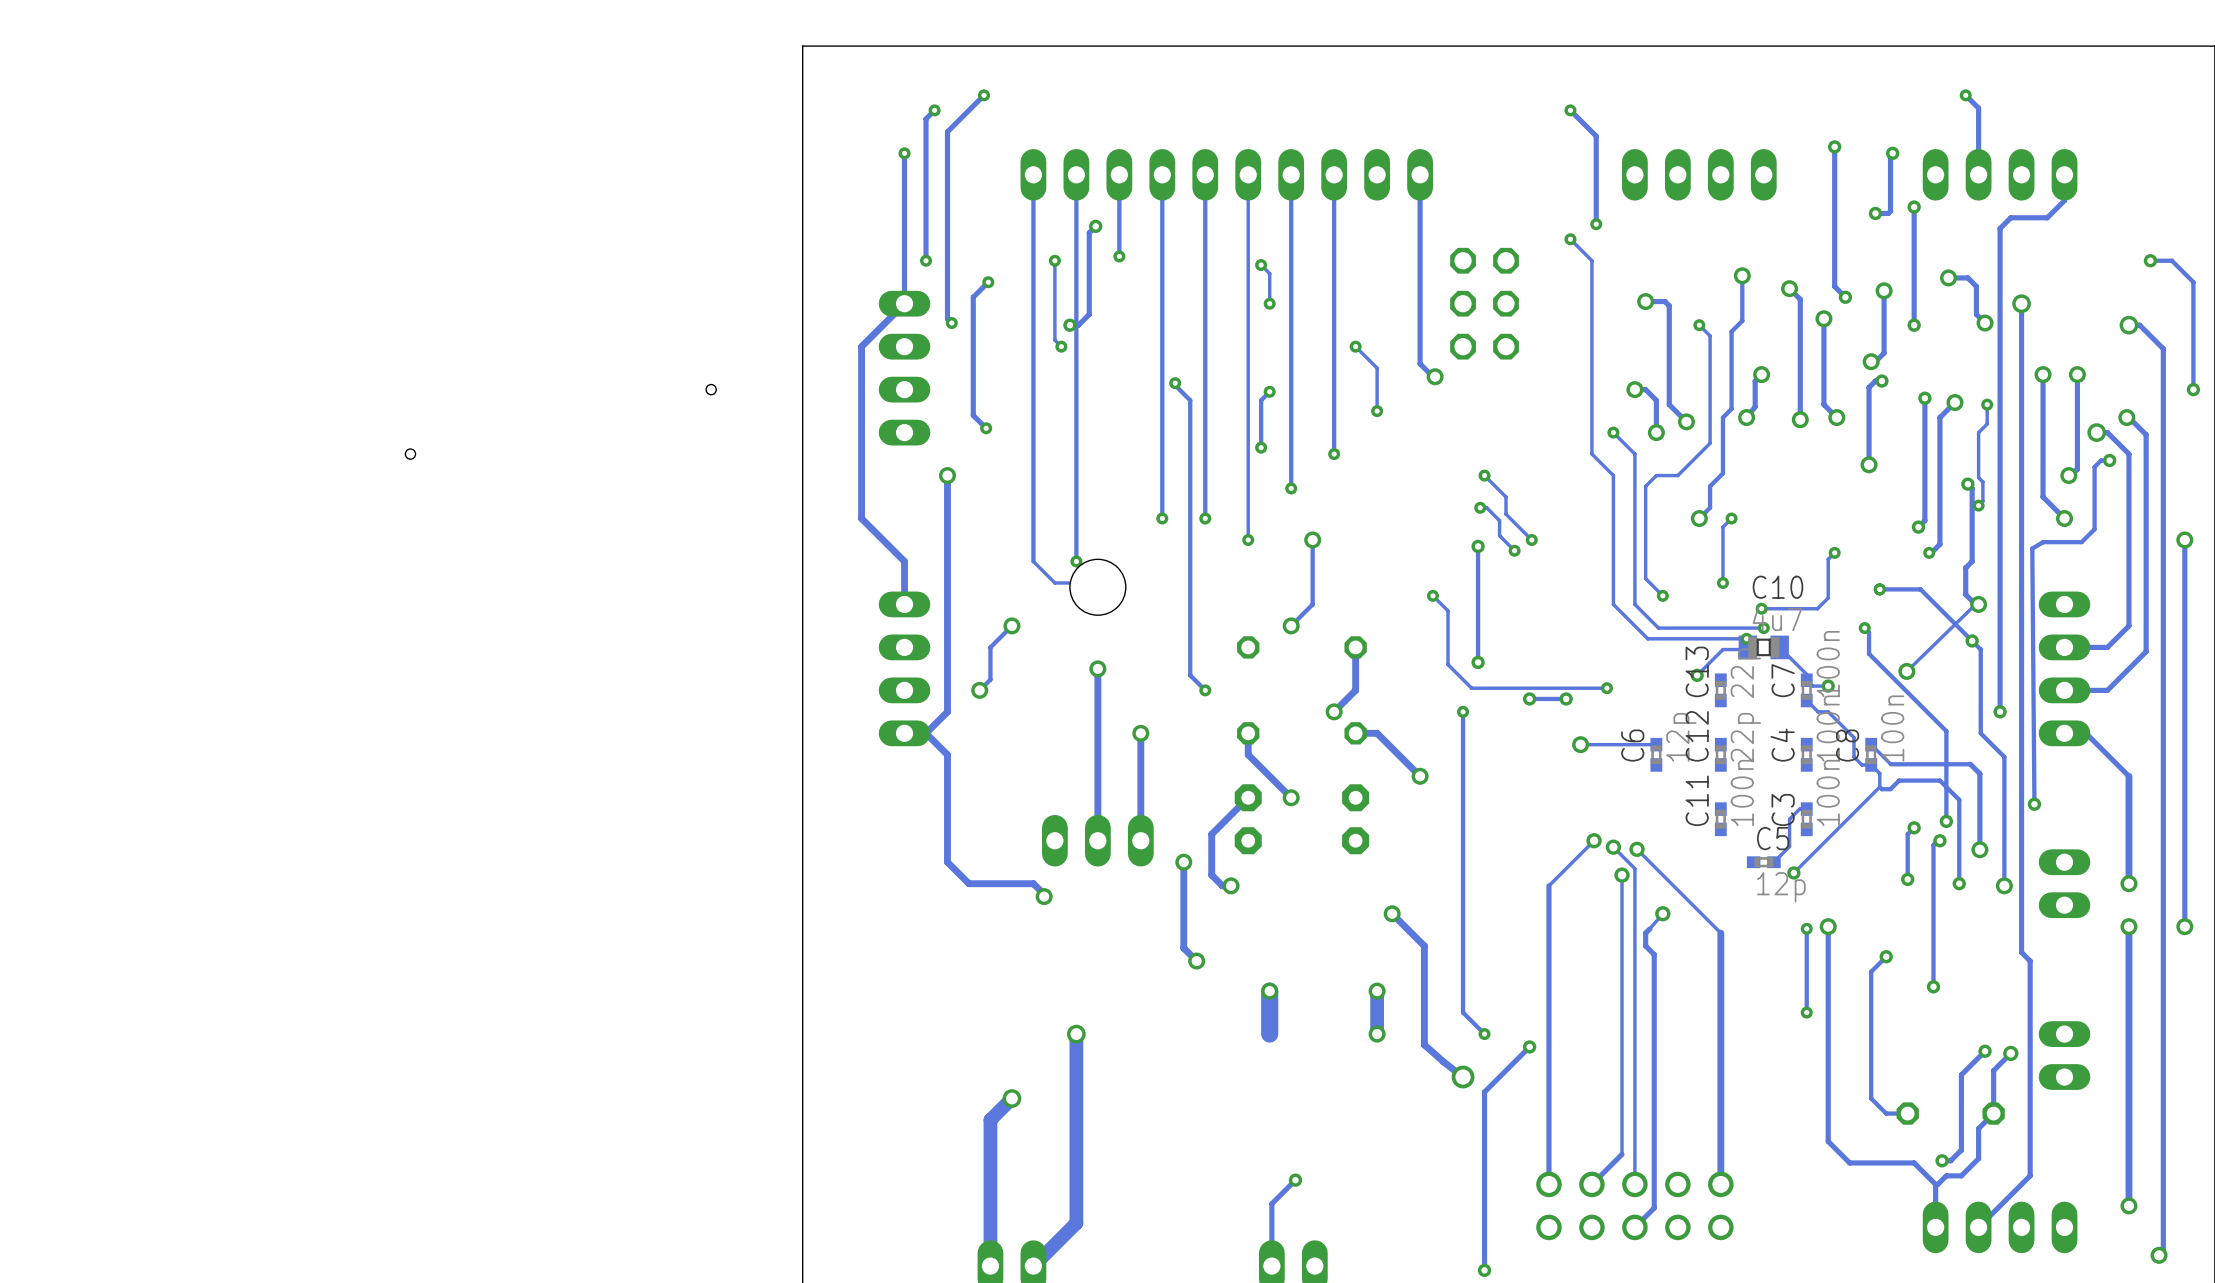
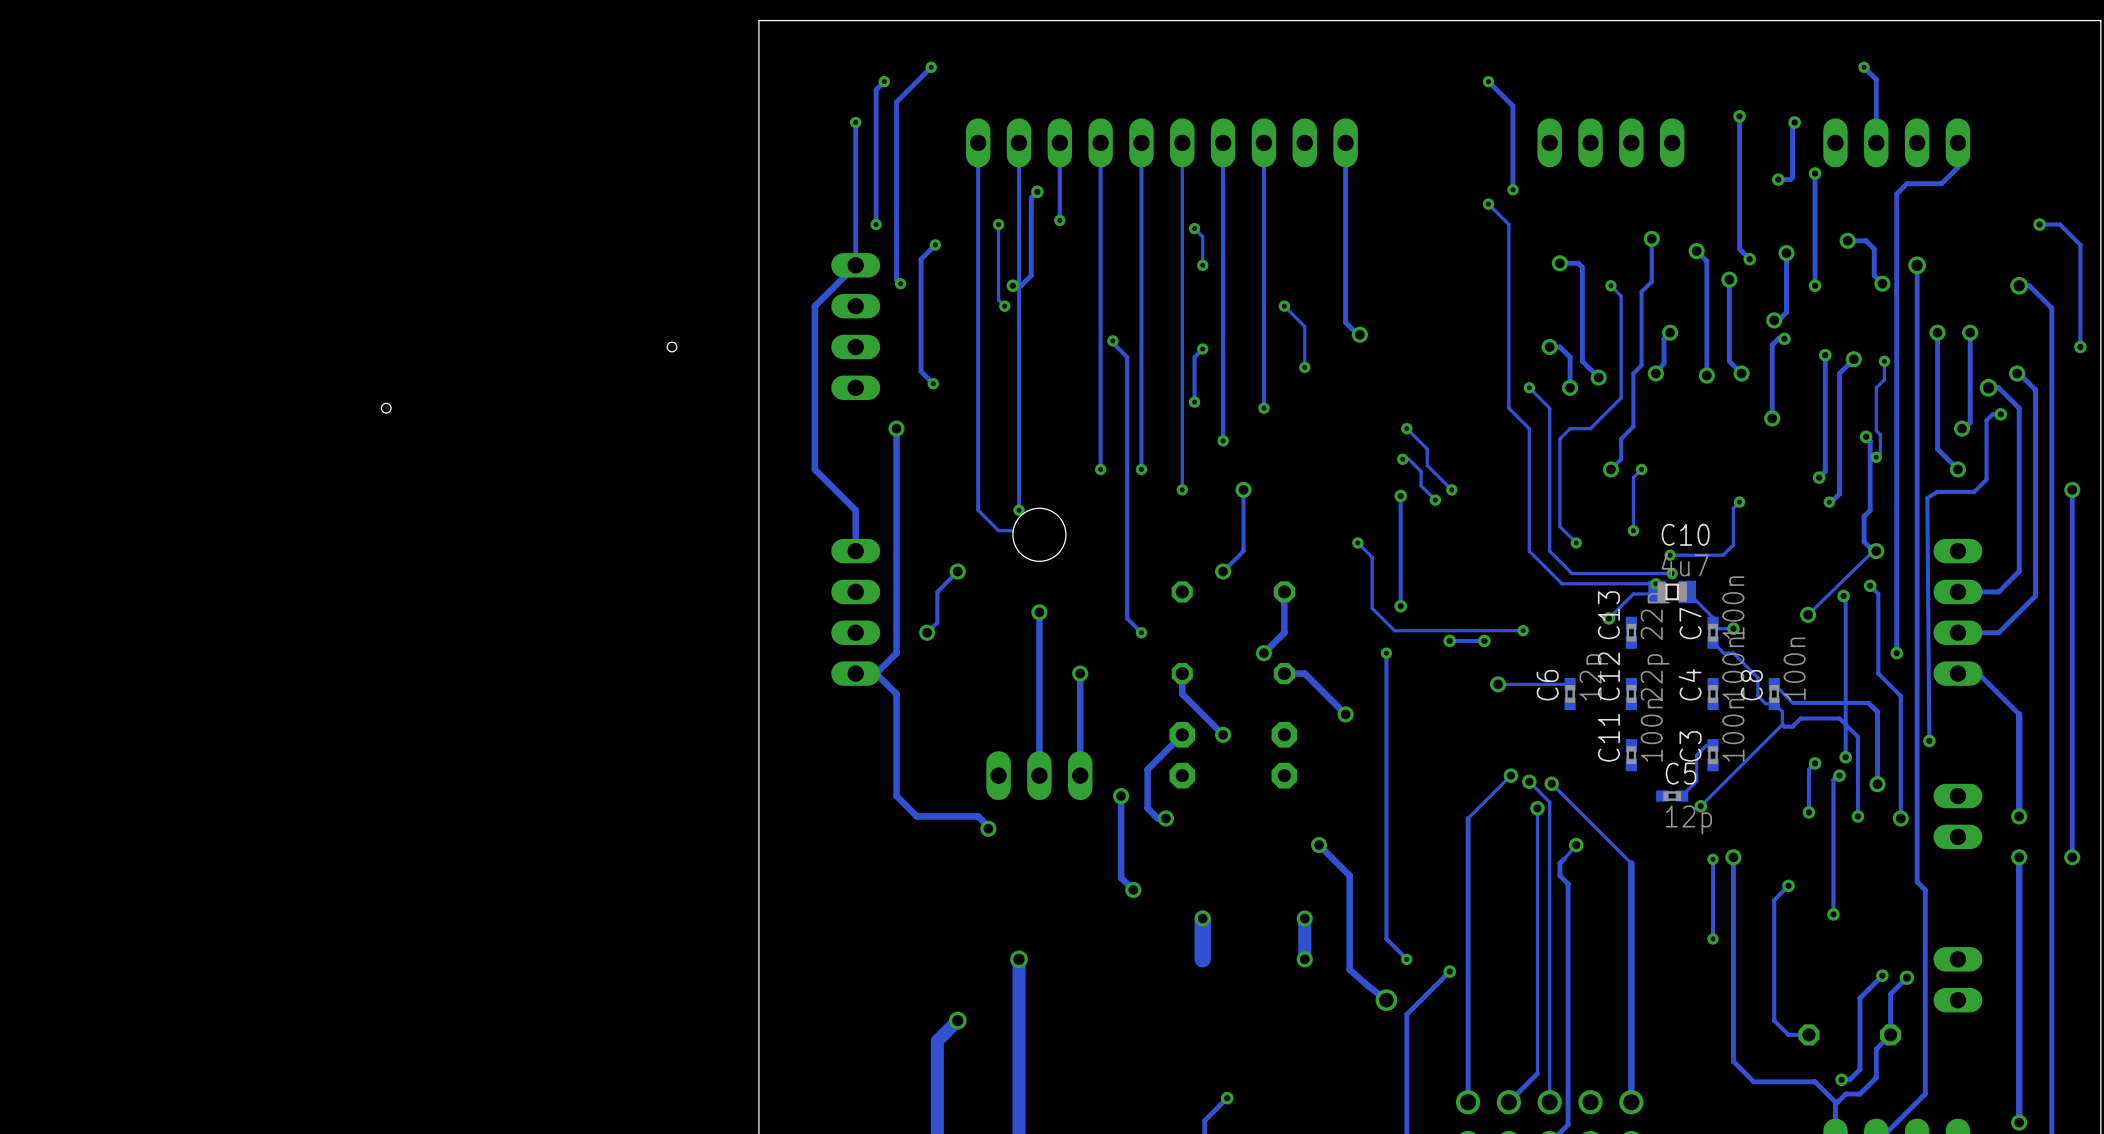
part: (1484, 303) -> none
track: (1879, 589) (1920, 589) (1972, 640) -> none
via: (1879, 589) -> none
track: (1864, 628) (1869, 632) (1869, 653) (1946, 731) -> (1843, 596) (1845, 598) (1845, 671)
via: (1864, 628) -> none
via: none -> (1843, 596)

